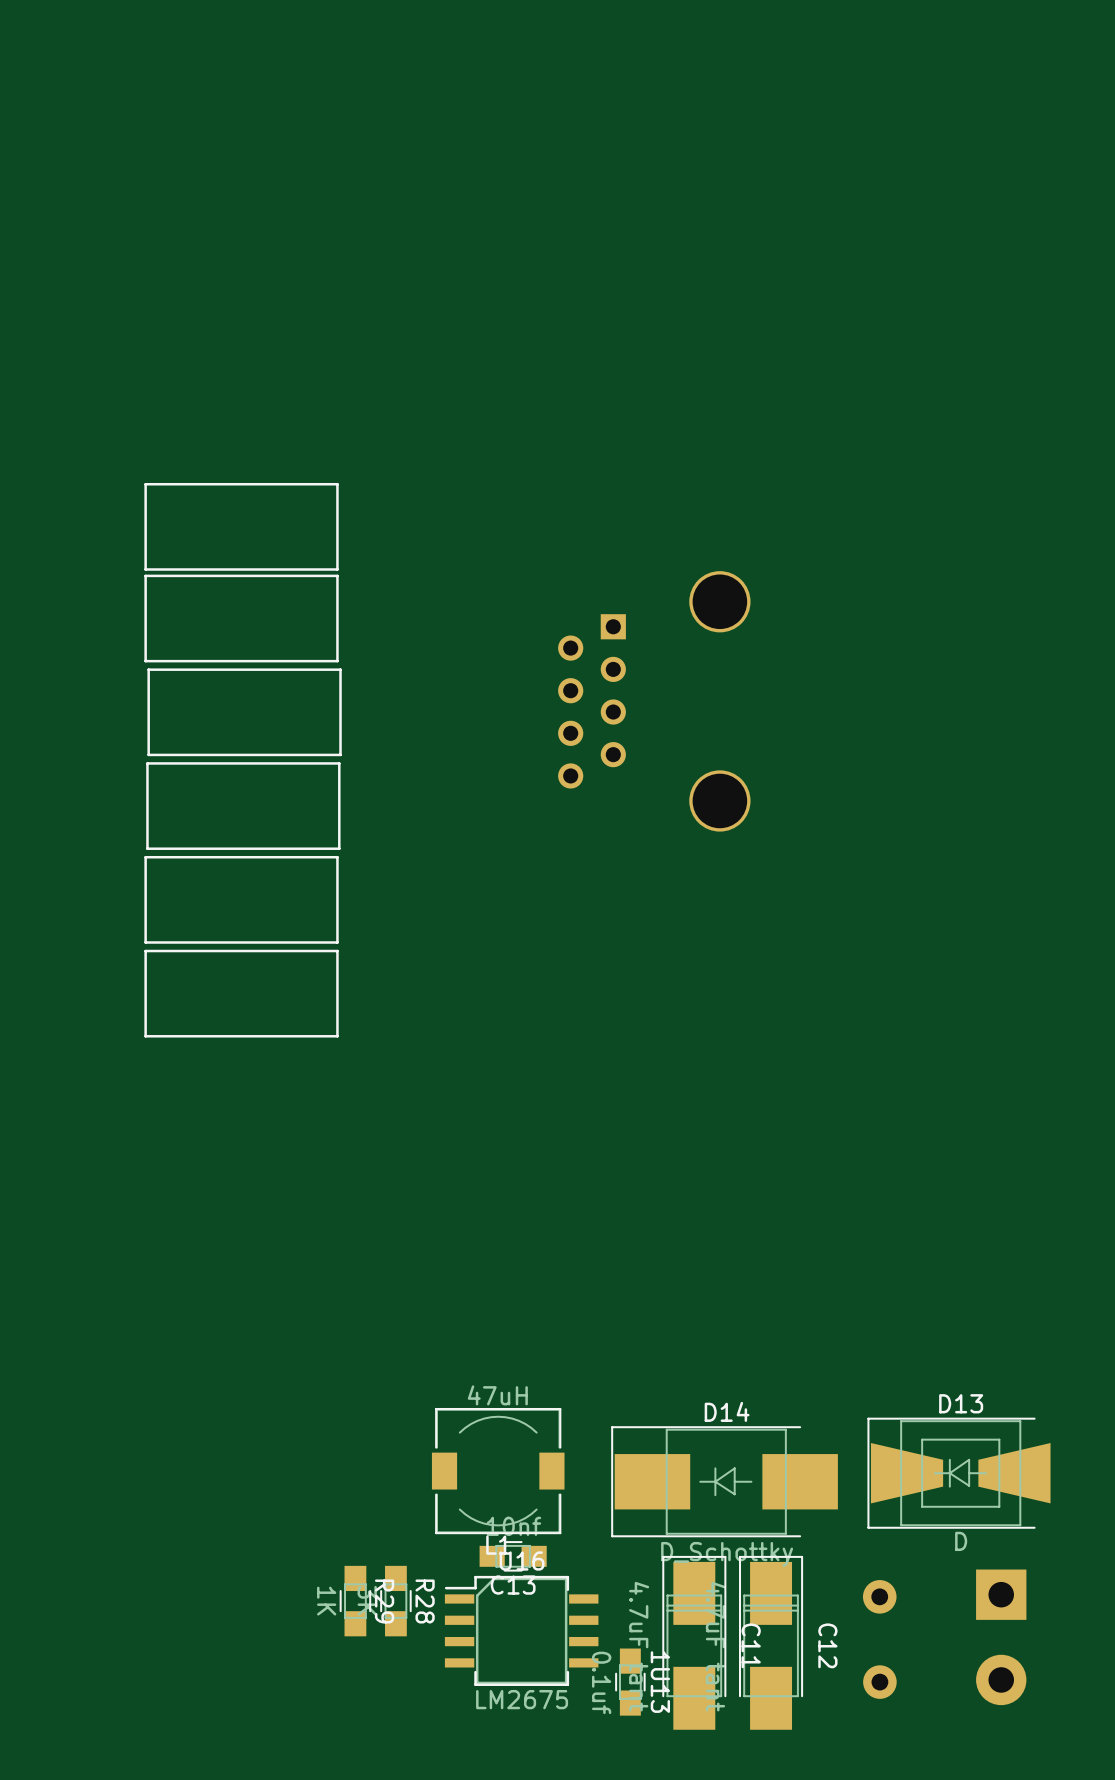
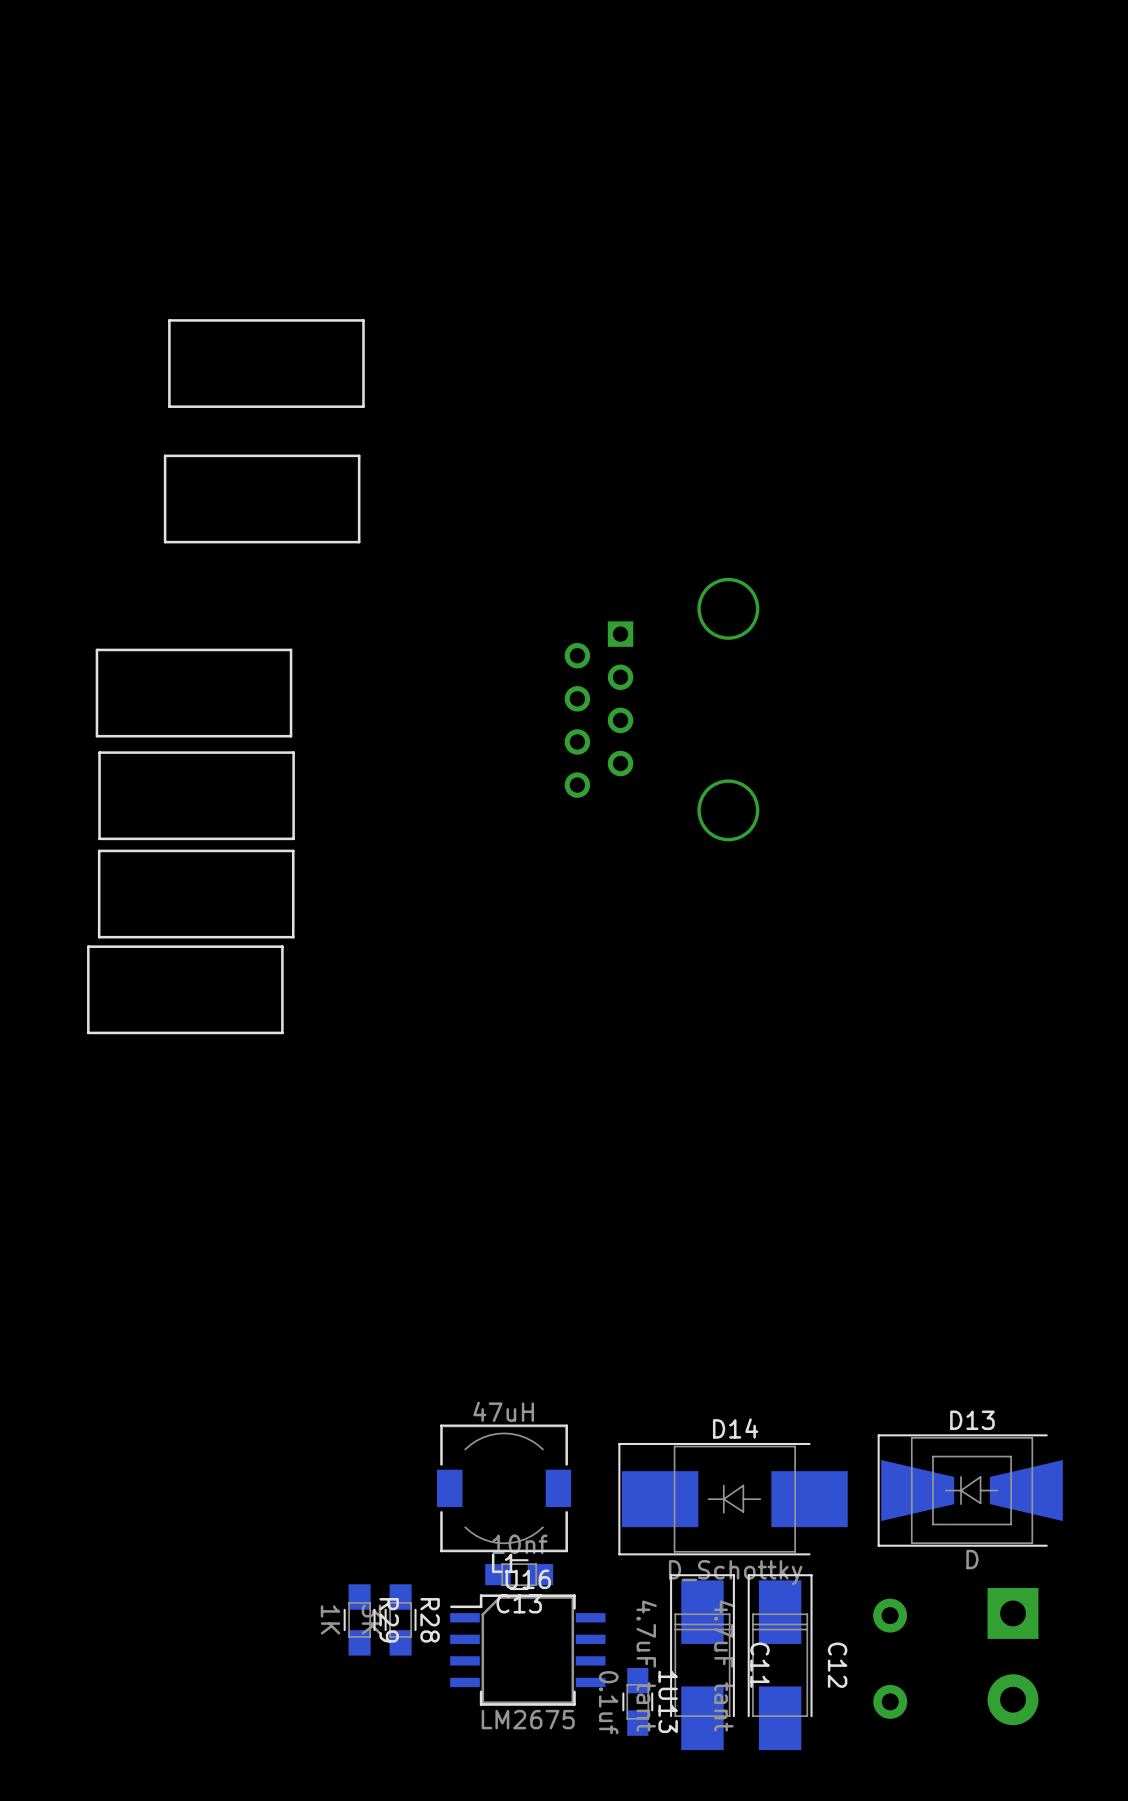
part: none -> (266, 363)
part position: (241, 526) -> (262, 498)
part: (241, 618) -> none
part: none -> (193, 693)
part: (244, 712) -> none
part: none -> (196, 795)
part: (243, 806) -> none
part: none -> (196, 894)
part: (241, 899) -> none
part: none -> (185, 989)
part: (241, 993) -> none

